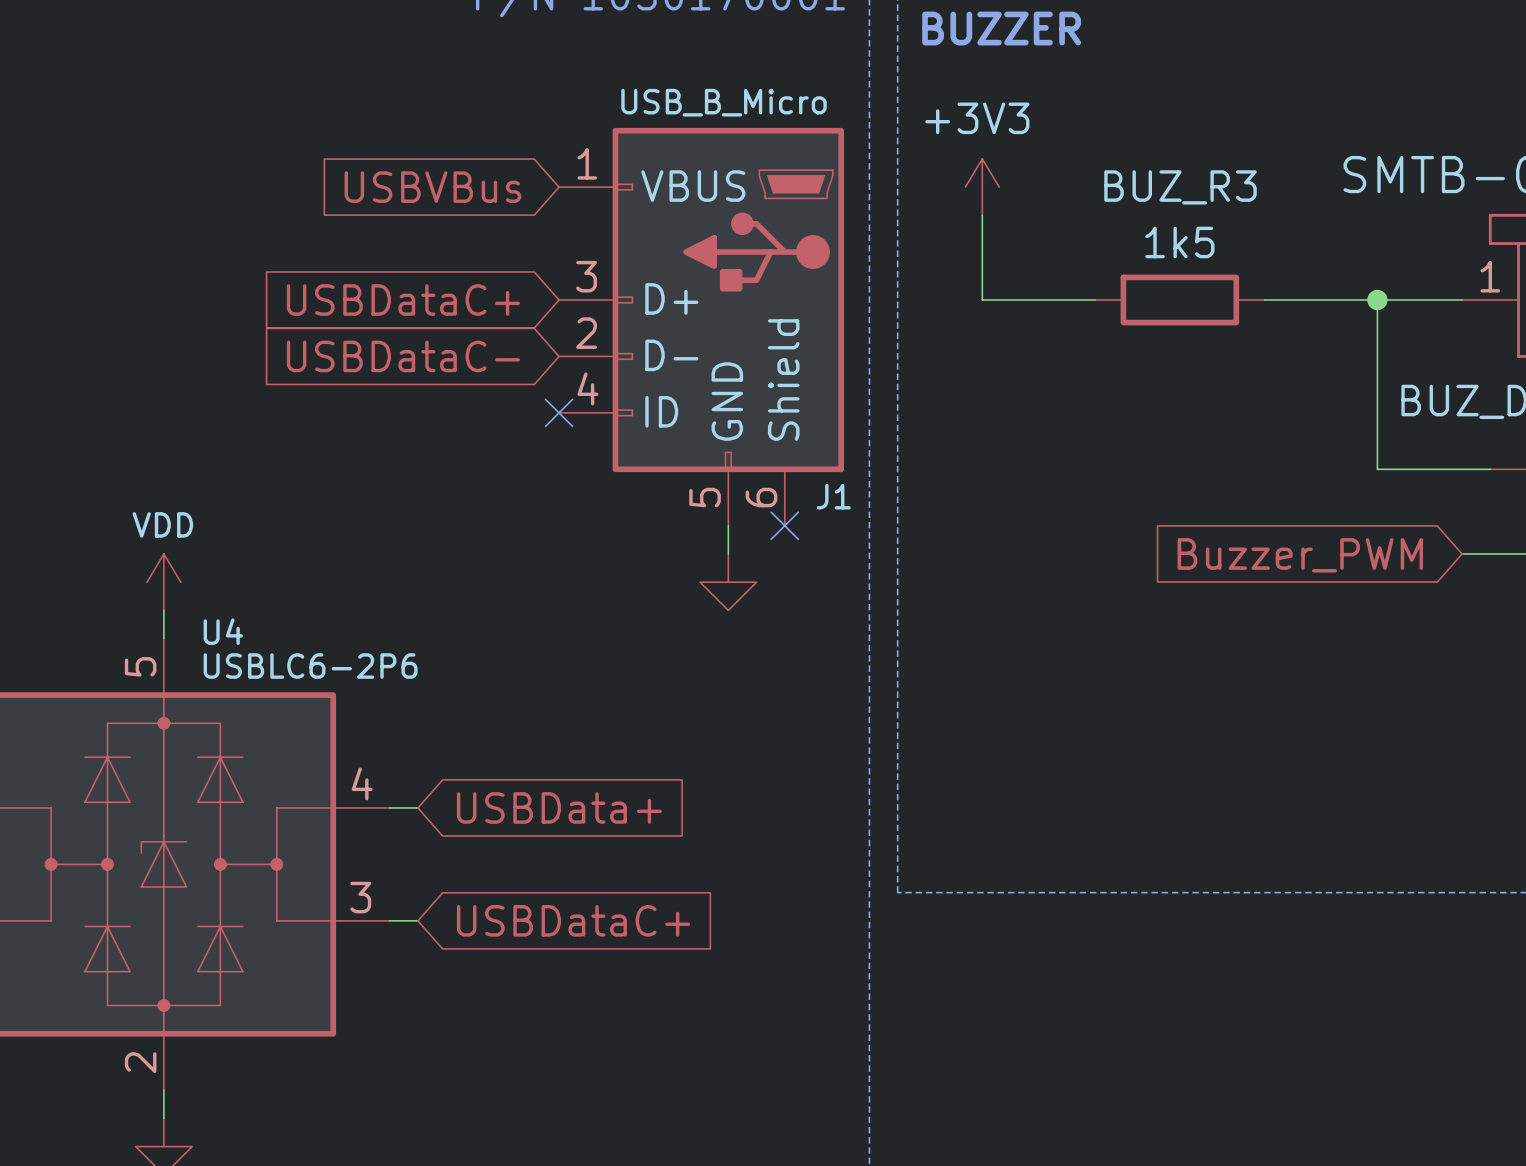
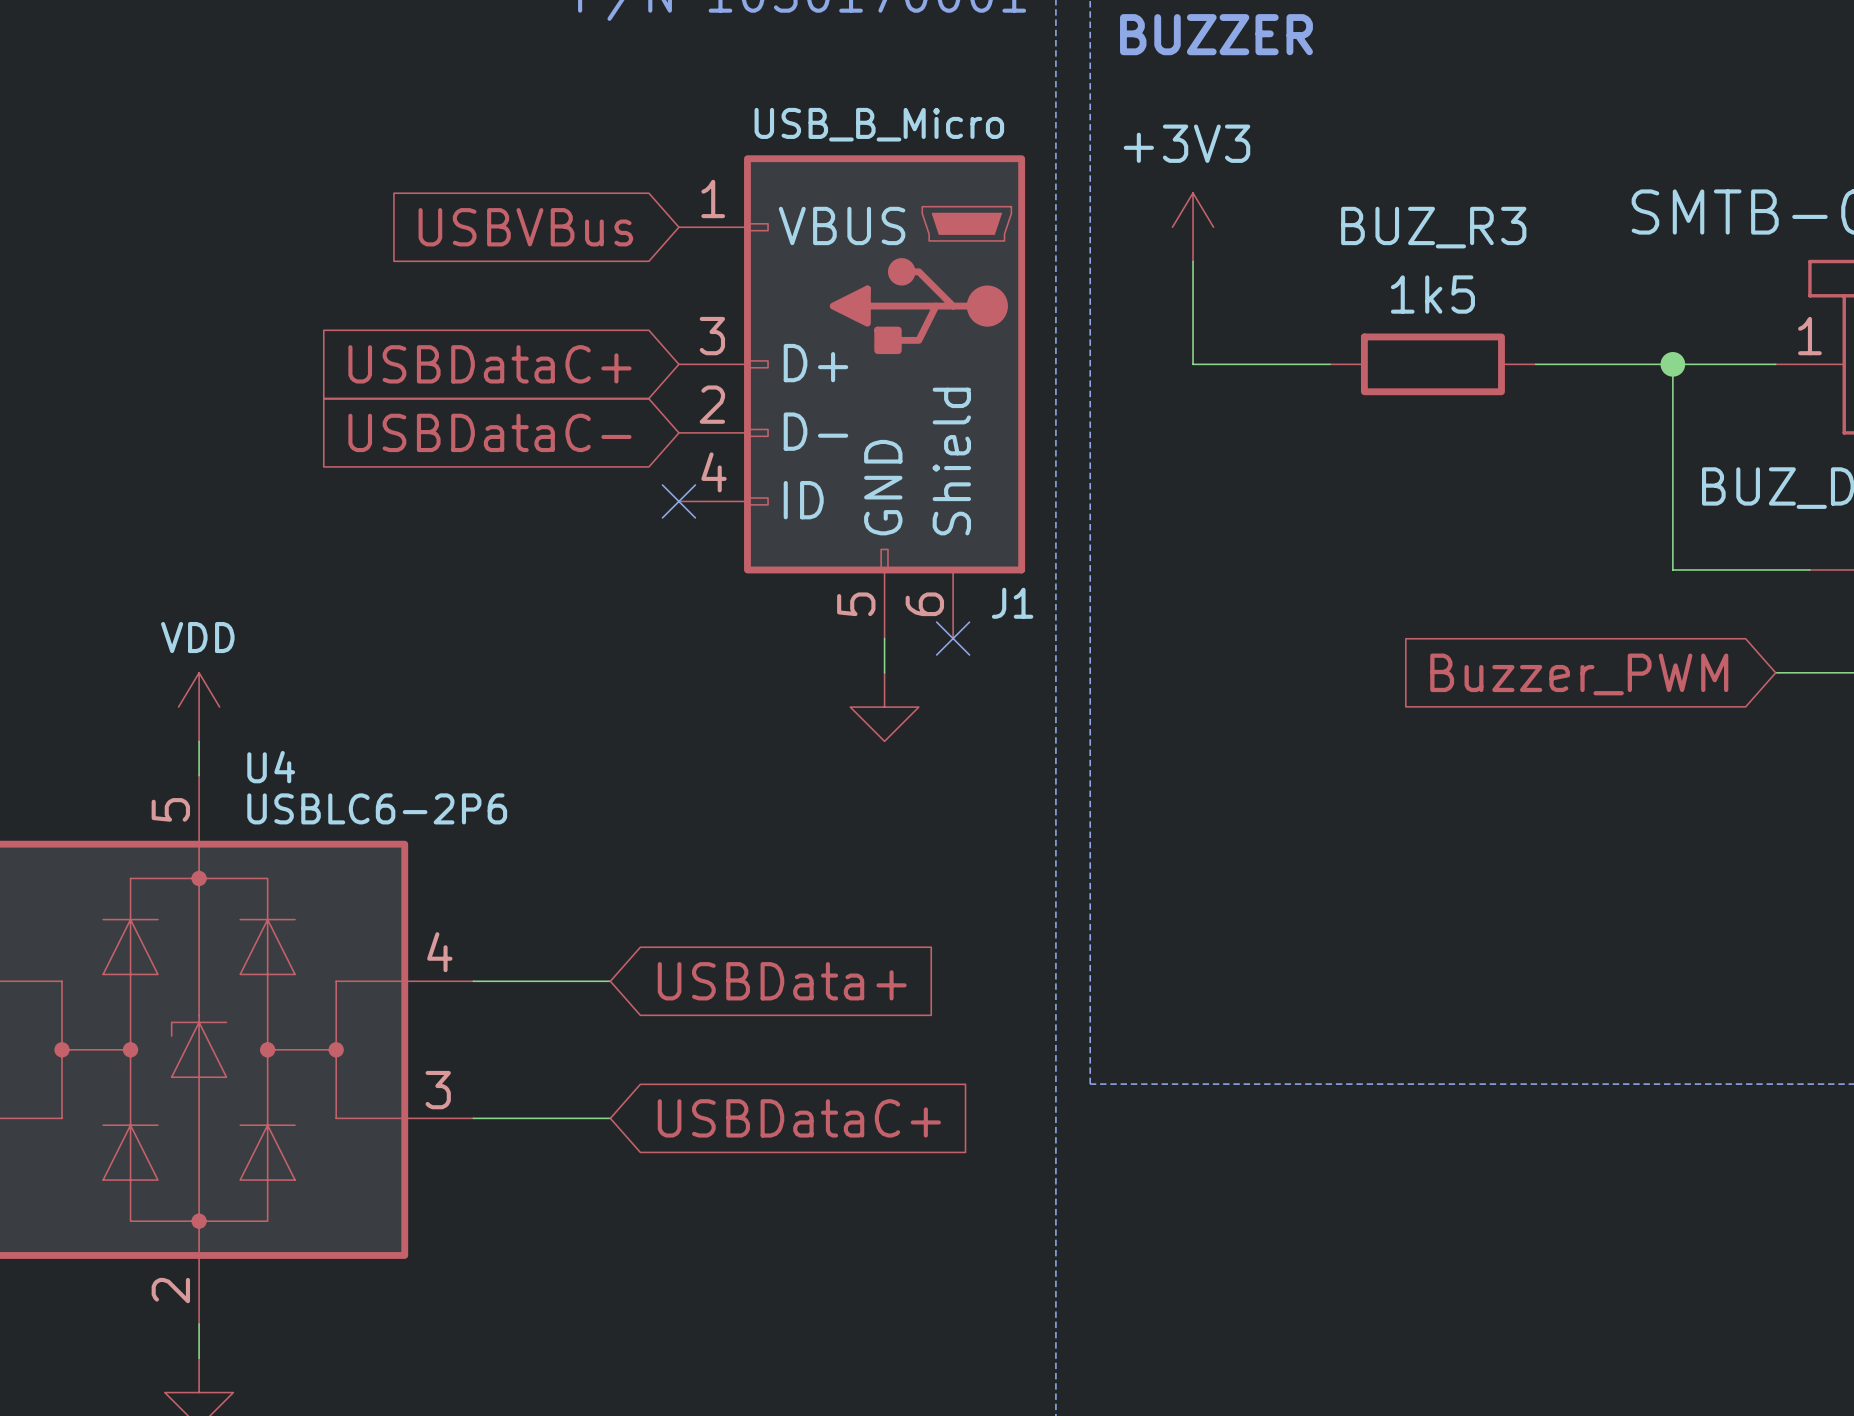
wire: none -> (507, 981) (610, 981)
global label position: USBData+ (559, 807) -> USBData+ (782, 981)
wire: none -> (507, 1118) (610, 1118)
global label position: USBDataC+ (573, 920) -> USBDataC+ (799, 1118)

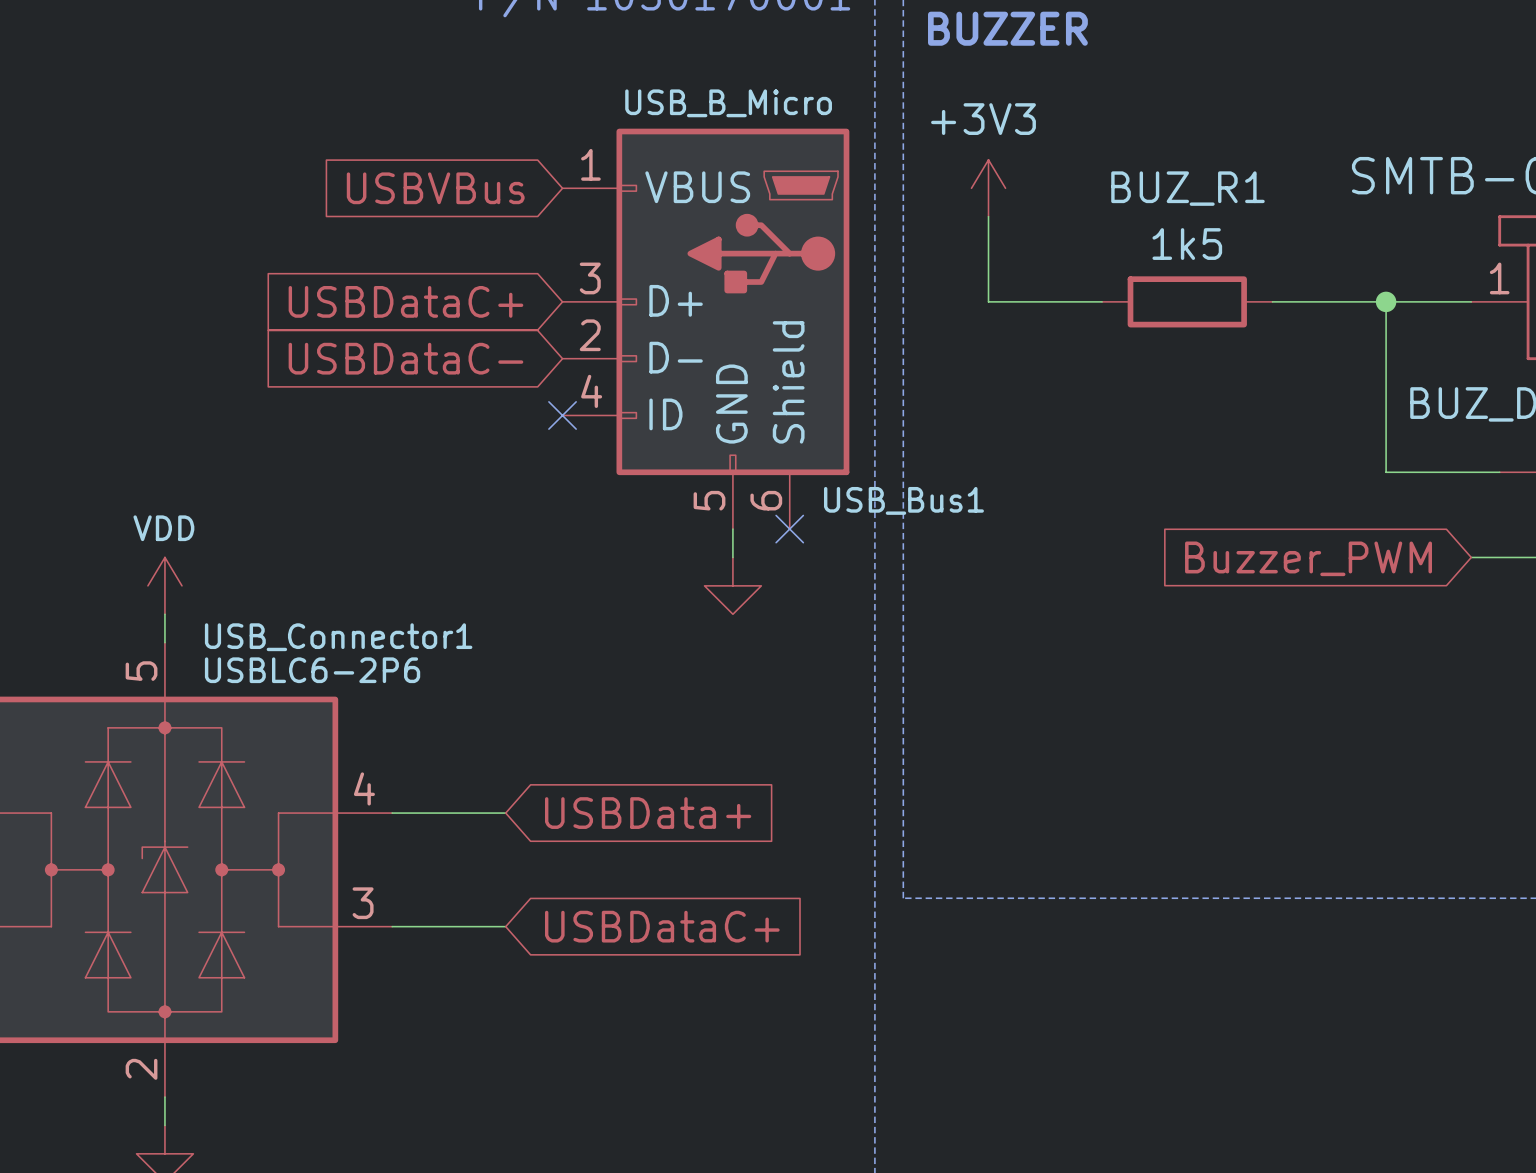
BUZ_R3 name: BUZ_R3 (1433, 227) -> BUZ_R1 (1187, 188)
J1 name: J1 (1012, 603) -> USB_Bus1 (903, 500)
U4 name: U4 (271, 767) -> USB_Connector1 (338, 637)

